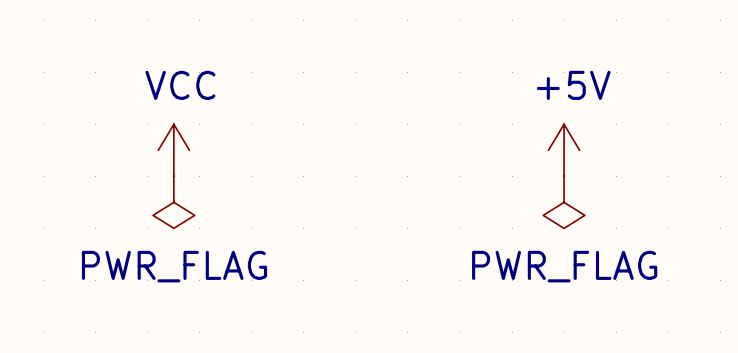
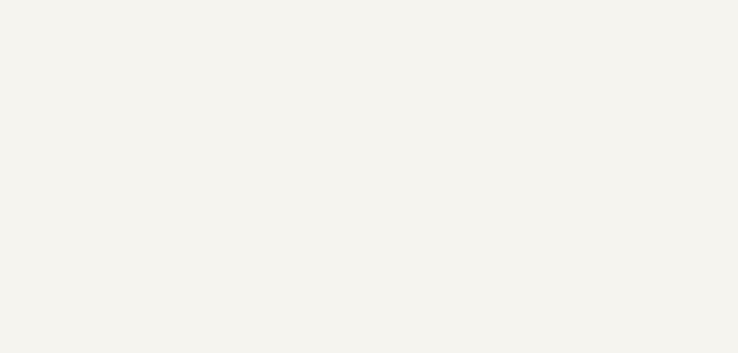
power symbol: VCC (173, 150) -> none
power symbol: +5V (564, 150) -> none
power symbol: PWR_FLAG (173, 202) -> none
power symbol: PWR_FLAG (564, 202) -> none

